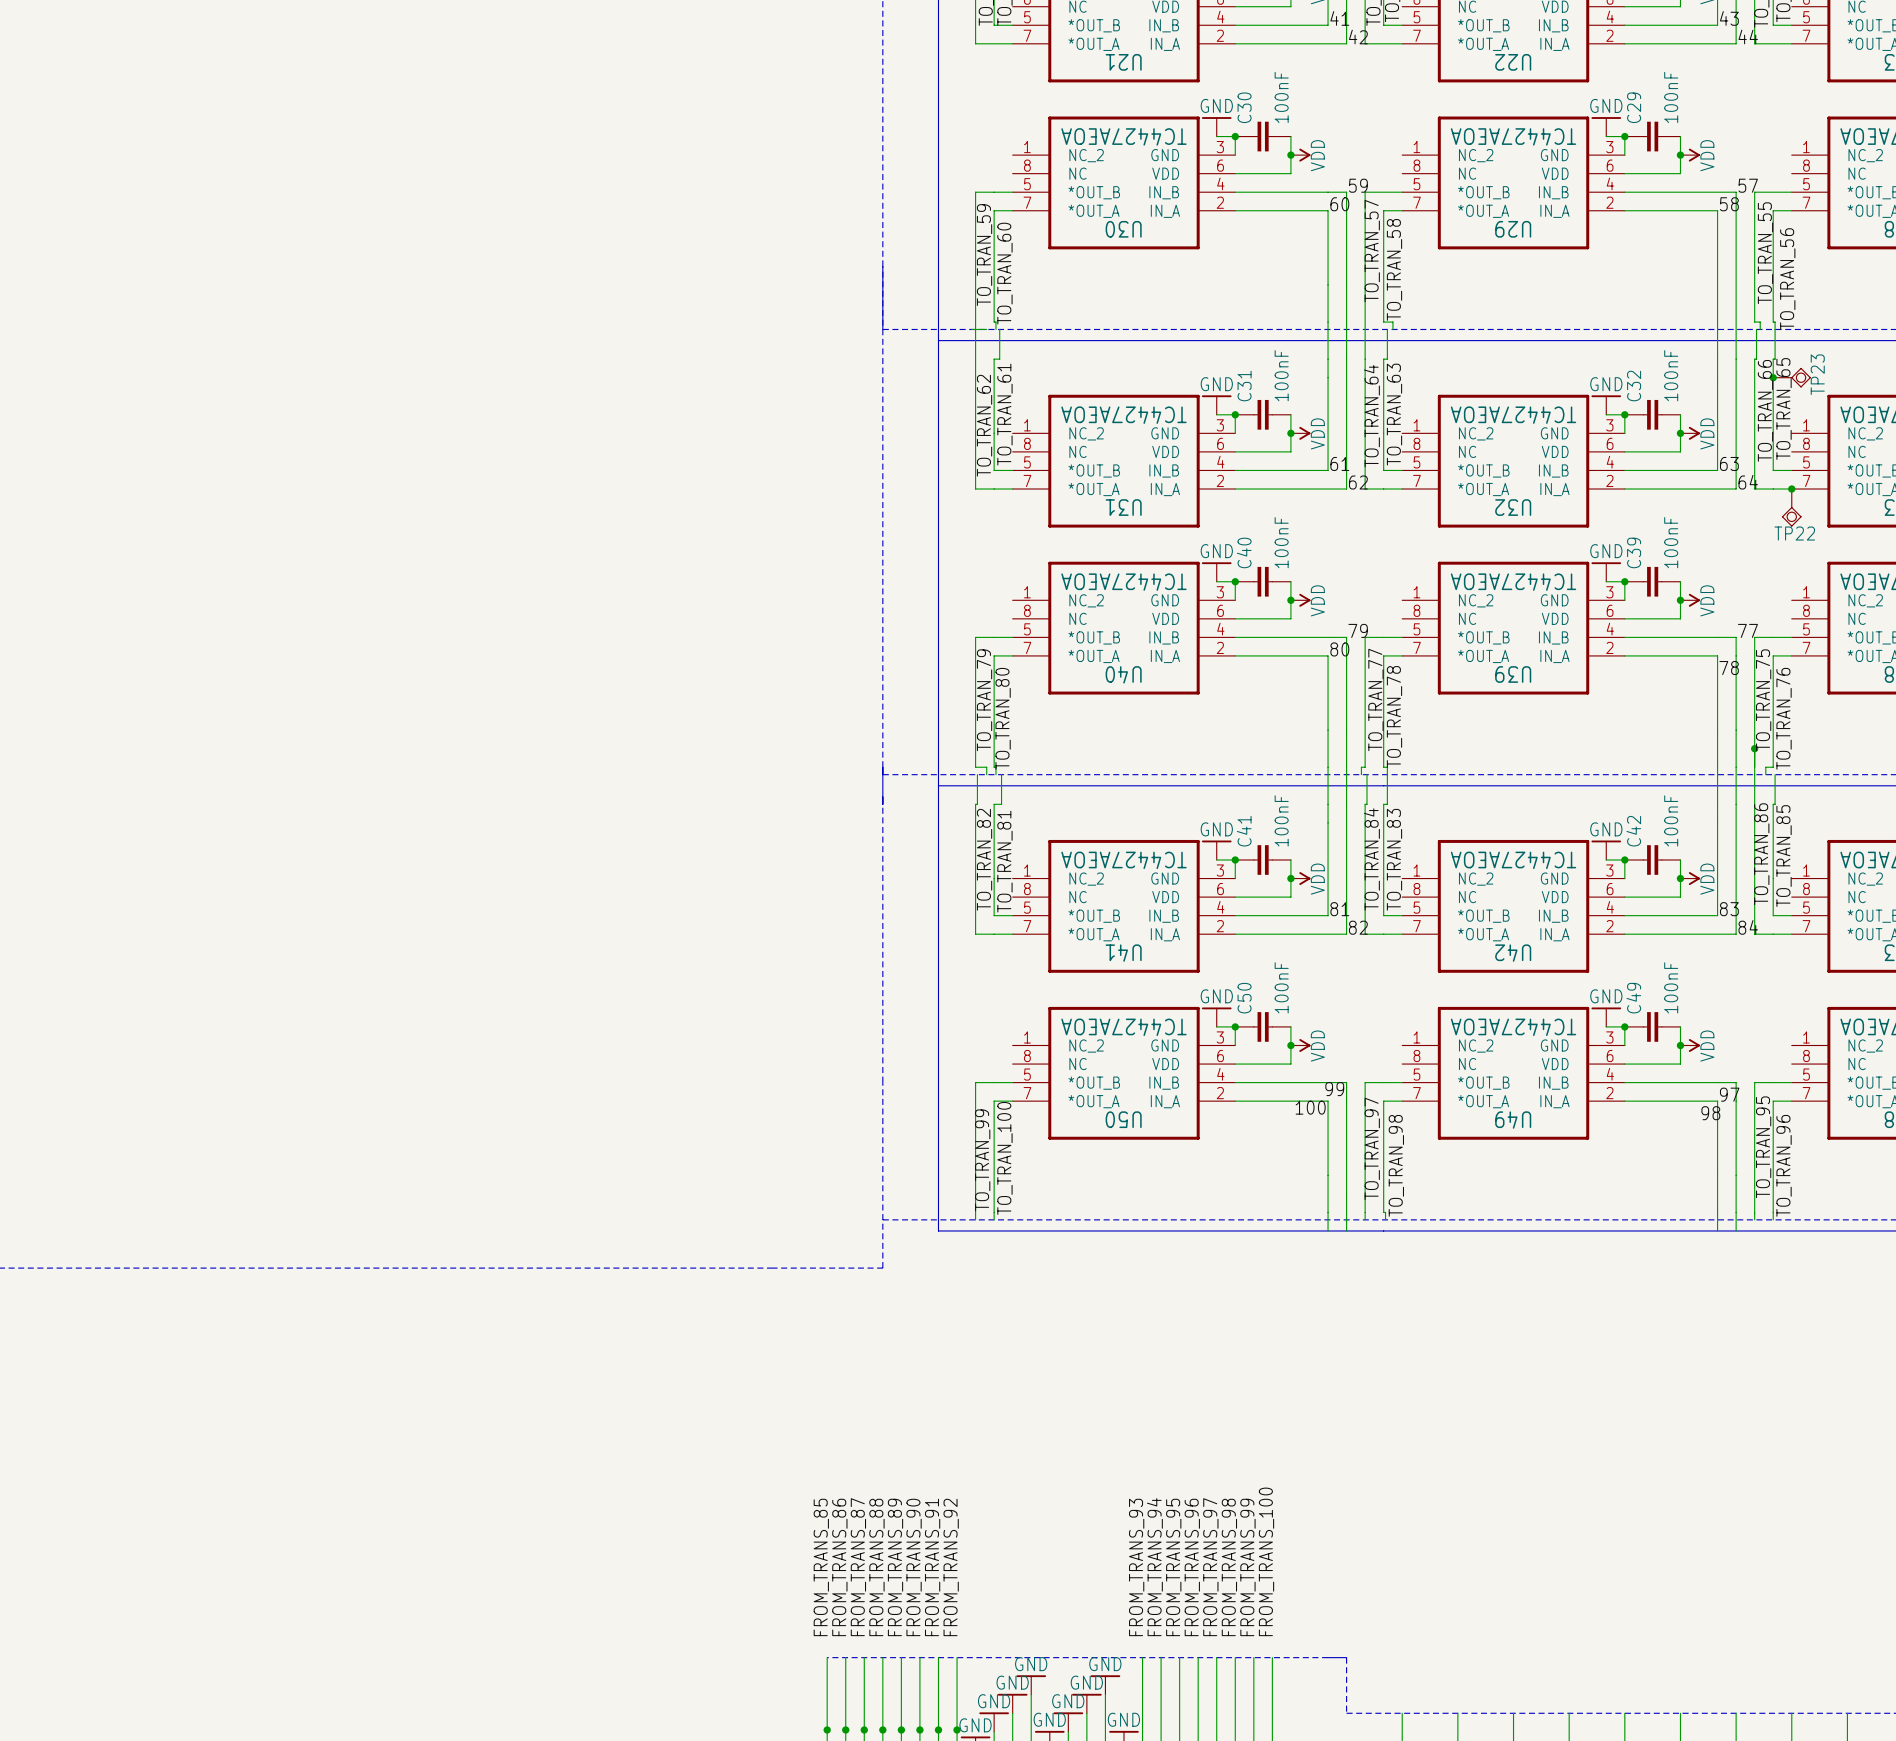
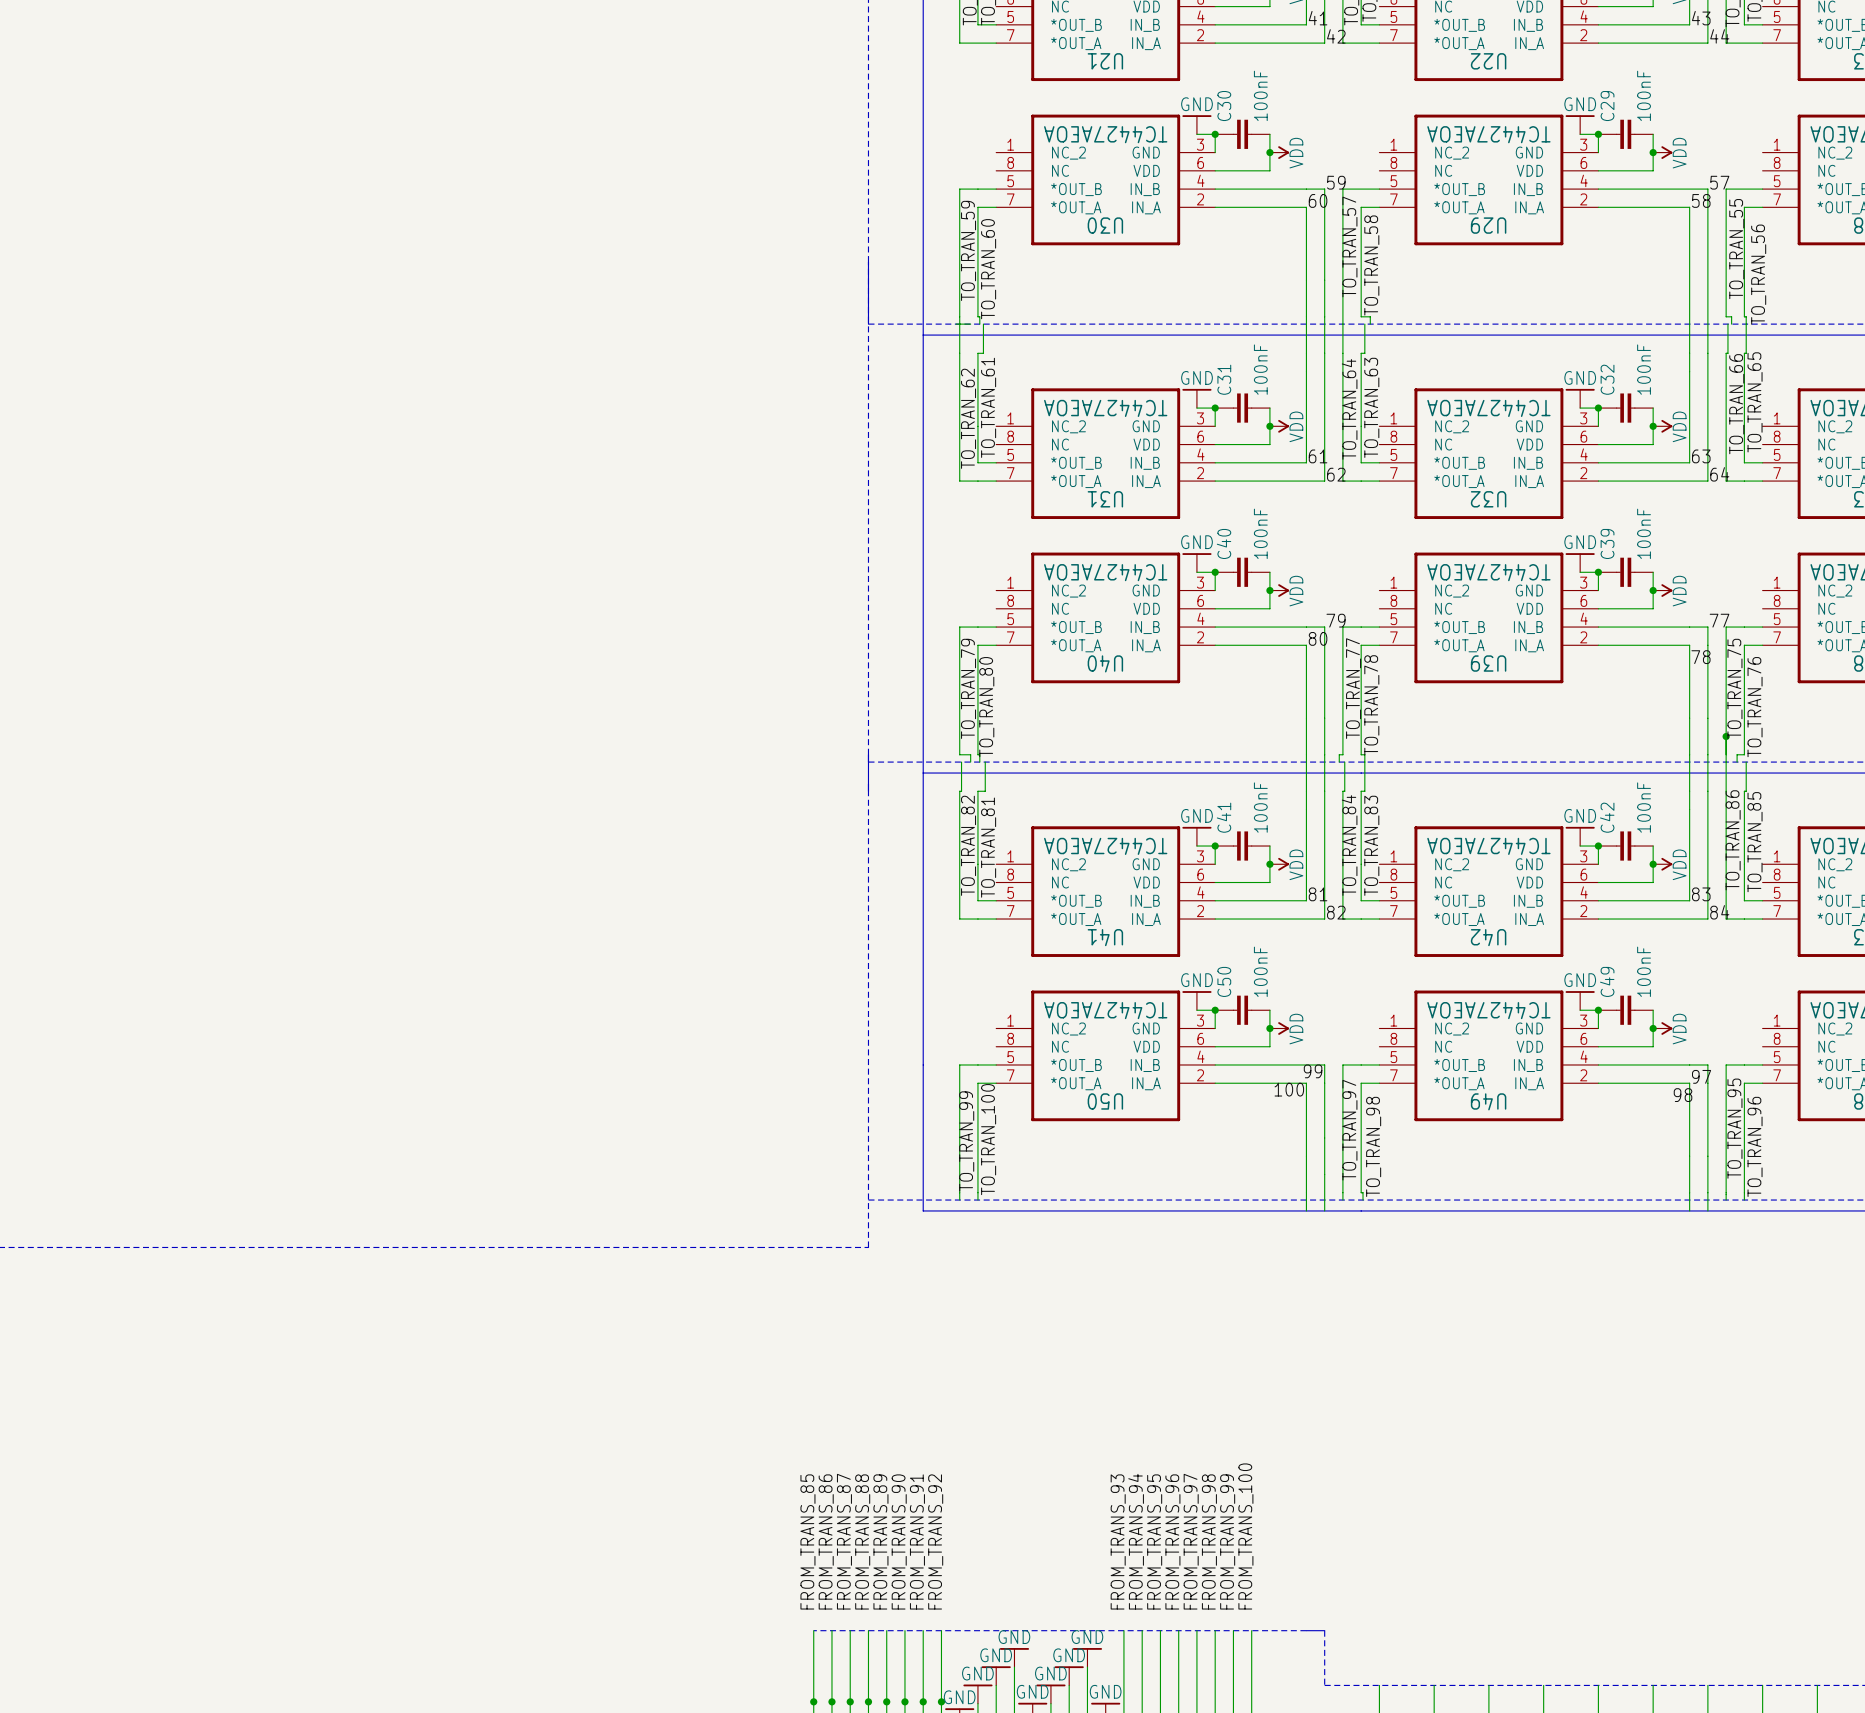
junction: (1773, 377) -> none
TP23: (1792, 377) -> none
junction: (1791, 489) -> none
TP22: (1791, 507) -> none

